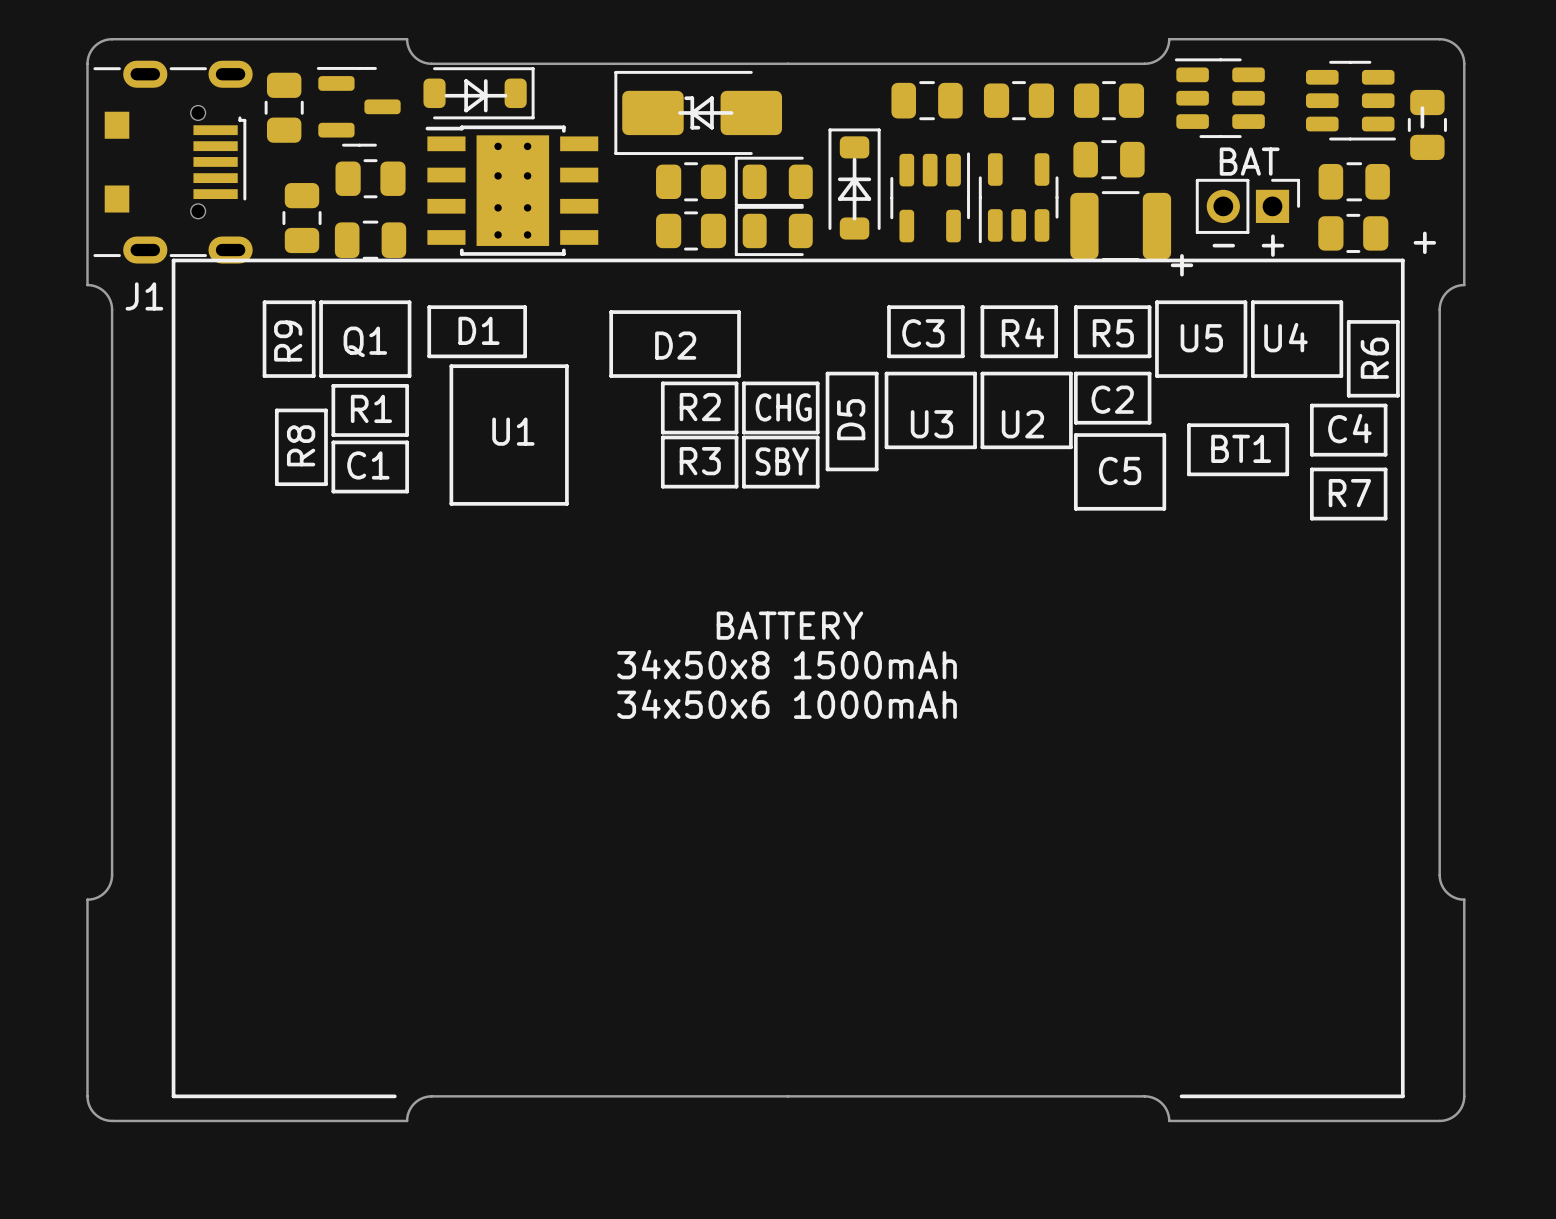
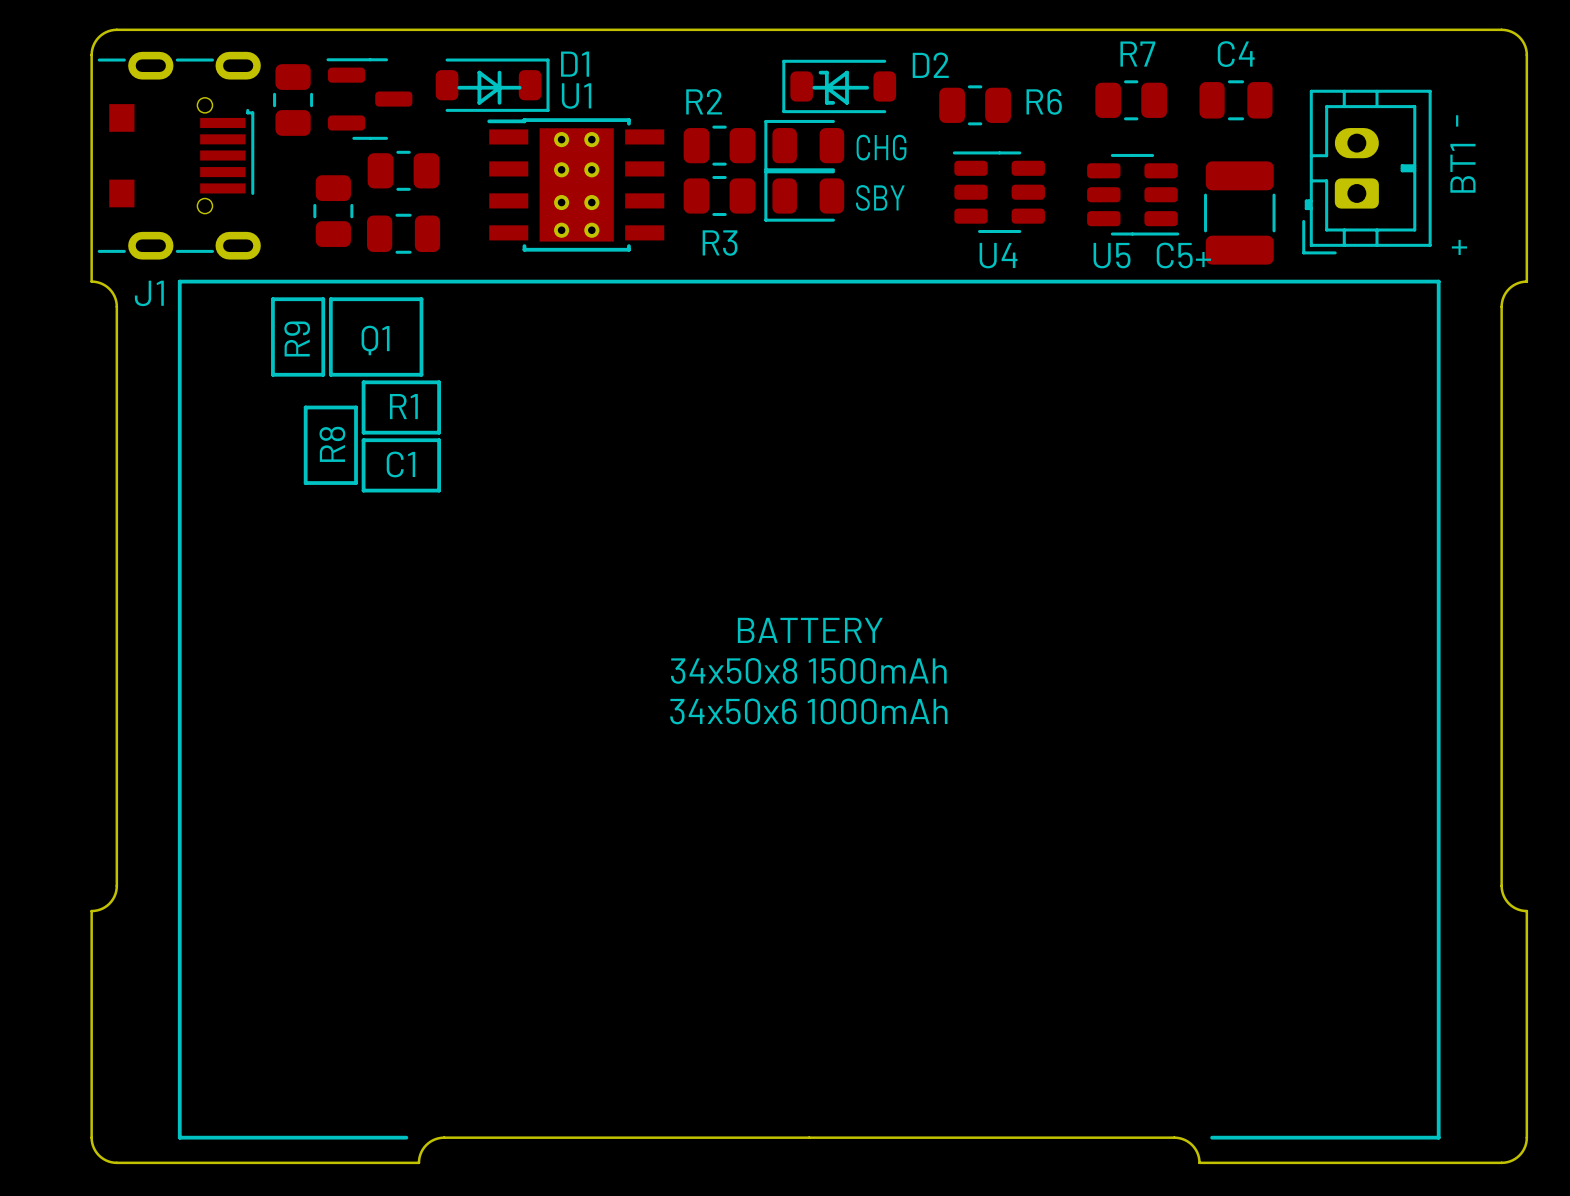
board edge: (407, 39) (408, 47) (414, 56) (423, 62) (431, 63) (1144, 63) (1152, 62) (1162, 56) (1167, 47) (1169, 39) -> (418, 29) (1199, 29)
board edge: (1439, 39) (1450, 41) (1457, 46) (1462, 55) (1464, 63) (1464, 285) (1456, 286) (1446, 292) (1442, 298) (1439, 309) (1439, 875) (1441, 883) (1446, 892) (1453, 897) (1464, 899) (1464, 1096) (1461, 1107) (1455, 1115) (1439, 1120) (1169, 1120) (1167, 1112) (1162, 1103) (1152, 1097) (1144, 1096) (431, 1096) (421, 1098) (414, 1103) (408, 1112) (407, 1120) (112, 1120) (103, 1119) (94, 1113) (89, 1107) (87, 1096) -> (1476, 29) (1504, 29) (1512, 32) (1522, 41) (1526, 54) (1526, 281) (1515, 284) (1509, 288) (1503, 298) (1501, 306) (1501, 885) (1503, 894) (1509, 903) (1518, 909) (1526, 911) (1526, 1137) (1524, 1148) (1517, 1157) (1501, 1162) (1199, 1162) (1198, 1154) (1192, 1145) (1182, 1139) (1174, 1137) (444, 1137) (433, 1140) (426, 1145) (421, 1151) (418, 1162) (116, 1162) (103, 1158) (94, 1148) (91, 1140) (91, 1112)
D2 footprint: [614, 70, 783, 156] -> [782, 59, 897, 114]
line: (686, 98) (692, 98) (692, 127) (698, 127) -> (820, 72) (826, 72) (826, 102) (833, 102)
line: (711, 98) (711, 127) (692, 112) (711, 98) -> (847, 72) (847, 102) (826, 87) (847, 72)
U5 rotation: 0° (1219, 98) -> 180° (1133, 194)
U5 position: (1219, 98) -> (1133, 194)
C3: (927, 100) -> none
R4: (1018, 100) -> none
R5: (1109, 100) -> none
U4 rotation: 0° (1350, 100) -> 180° (998, 192)
U4 position: (1350, 100) -> (998, 192)
line: (680, 112) (731, 112) -> (814, 87) (867, 87)
R6 rotation: 0° (1427, 124) -> 90° clockwise (975, 105)
R6 position: (1427, 124) -> (975, 105)
part: none -> (804, 145)
line: (854, 159) (854, 218) -> none
C2: (1109, 159) -> none
text: BAT (1249, 161) -> none
R1 position: (370, 178) -> (403, 170)
BT1 footprint: [1195, 178, 1301, 234] -> [1302, 89, 1432, 255]
line: (839, 179) (869, 179) -> none
line: (854, 179) (869, 199) (839, 199) (854, 179) -> none
R2 position: (691, 181) -> (719, 145)
part: (773, 181) -> none
C4 position: (1354, 181) -> (1236, 100)
D5: (854, 184) -> none
U1 position: (511, 190) -> (575, 184)
U3: (930, 197) -> none
U2: (1018, 198) -> none
part: none -> (804, 195)
R8 position: (302, 218) -> (333, 211)
C5 rotation: 0° (1120, 226) -> 90° clockwise (1239, 212)
C5 position: (1120, 226) -> (1239, 212)
R3 position: (691, 230) -> (719, 195)
part: (773, 230) -> none
R7 position: (1353, 233) -> (1131, 100)
C1 position: (370, 240) -> (403, 233)
text: - + (1248, 245) -> none
line: (173, 285) (173, 260) (1402, 260) (1402, 285) -> (179, 281) (1438, 281)
line: (1156, 302) (1245, 302) (1245, 376) (1156, 376) (1156, 302) -> none
line: (1252, 302) (1341, 302) (1341, 376) (1252, 376) (1252, 302) -> none
line: (429, 307) (525, 307) (525, 356) (429, 356) (429, 307) -> none
line: (888, 307) (962, 307) (962, 356) (888, 356) (888, 307) -> none
line: (982, 307) (982, 356) (1056, 356) (1056, 307) (982, 307) -> none
line: (1075, 307) (1149, 307) (1149, 356) (1075, 356) (1075, 307) -> none
line: (611, 312) (739, 312) (739, 376) (611, 376) (611, 312) -> none
line: (1348, 321) (1397, 321) (1397, 395) (1348, 395) (1348, 321) -> none
D1 name position: D1 (478, 330) -> D1 (575, 64)
U4 name position: U4 (1285, 337) -> U4 (998, 255)
U5 name position: U5 (1201, 338) -> U5 (1112, 255)
D2 name position: D2 (675, 345) -> D2 (930, 65)
R6 name position: R6 (1374, 358) -> R6 (1044, 101)
line: (451, 366) (566, 366) (566, 503) (451, 503) (451, 366) -> none
line: (827, 373) (876, 373) (876, 469) (827, 469) (827, 373) -> none
line: (886, 373) (975, 373) (975, 447) (886, 447) (886, 373) -> none
line: (982, 373) (1070, 373) (1070, 447) (982, 447) (982, 373) -> none
line: (1075, 373) (1149, 373) (1149, 422) (1075, 422) (1075, 373) -> none
line: (662, 383) (662, 432) (736, 432) (736, 383) (662, 383) -> none
line: (743, 383) (817, 383) (817, 432) (743, 432) (743, 383) -> none
line: (333, 385) (333, 435) (407, 435) (407, 385) (333, 385) -> (363, 382) (363, 432) (439, 432) (439, 382) (363, 382)
line: (1311, 405) (1311, 454) (1385, 454) (1385, 405) (1311, 405) -> none
R2 name position: R2 (700, 407) -> R2 (704, 101)
text position: CHG (783, 407) -> CHG (881, 147)
line: (276, 410) (325, 410) (325, 484) (276, 484) (276, 410) -> (305, 407) (356, 407) (356, 483) (305, 483) (305, 407)
line: (1188, 425) (1287, 425) (1287, 474) (1188, 474) (1188, 425) -> none
C4 name position: C4 (1349, 428) -> C4 (1236, 54)
U1 name position: U1 (513, 431) -> U1 (576, 95)
line: (1075, 435) (1075, 508) (1164, 508) (1164, 435) (1075, 435) -> none
line: (662, 437) (736, 437) (736, 486) (662, 486) (662, 437) -> none
line: (743, 437) (817, 437) (817, 486) (743, 486) (743, 437) -> none
line: (333, 442) (407, 442) (407, 491) (333, 491) (333, 442) -> (363, 440) (439, 440) (439, 490) (363, 490) (363, 440)
BT1 name position: BT1 (1241, 448) -> BT1 (1462, 168)
R3 name position: R3 (700, 461) -> R3 (720, 243)
text position: SBY (782, 461) -> SBY (880, 197)
line: (1311, 469) (1385, 469) (1385, 518) (1311, 518) (1311, 469) -> none
C5 name position: C5 (1120, 470) -> C5 (1174, 255)
R7 name position: R7 (1349, 493) -> R7 (1137, 54)
line: (173, 1096) (394, 1096) -> (179, 1112) (179, 1137) (406, 1137)
line: (1181, 1096) (1402, 1096) -> (1212, 1137) (1438, 1137) (1438, 1112)

